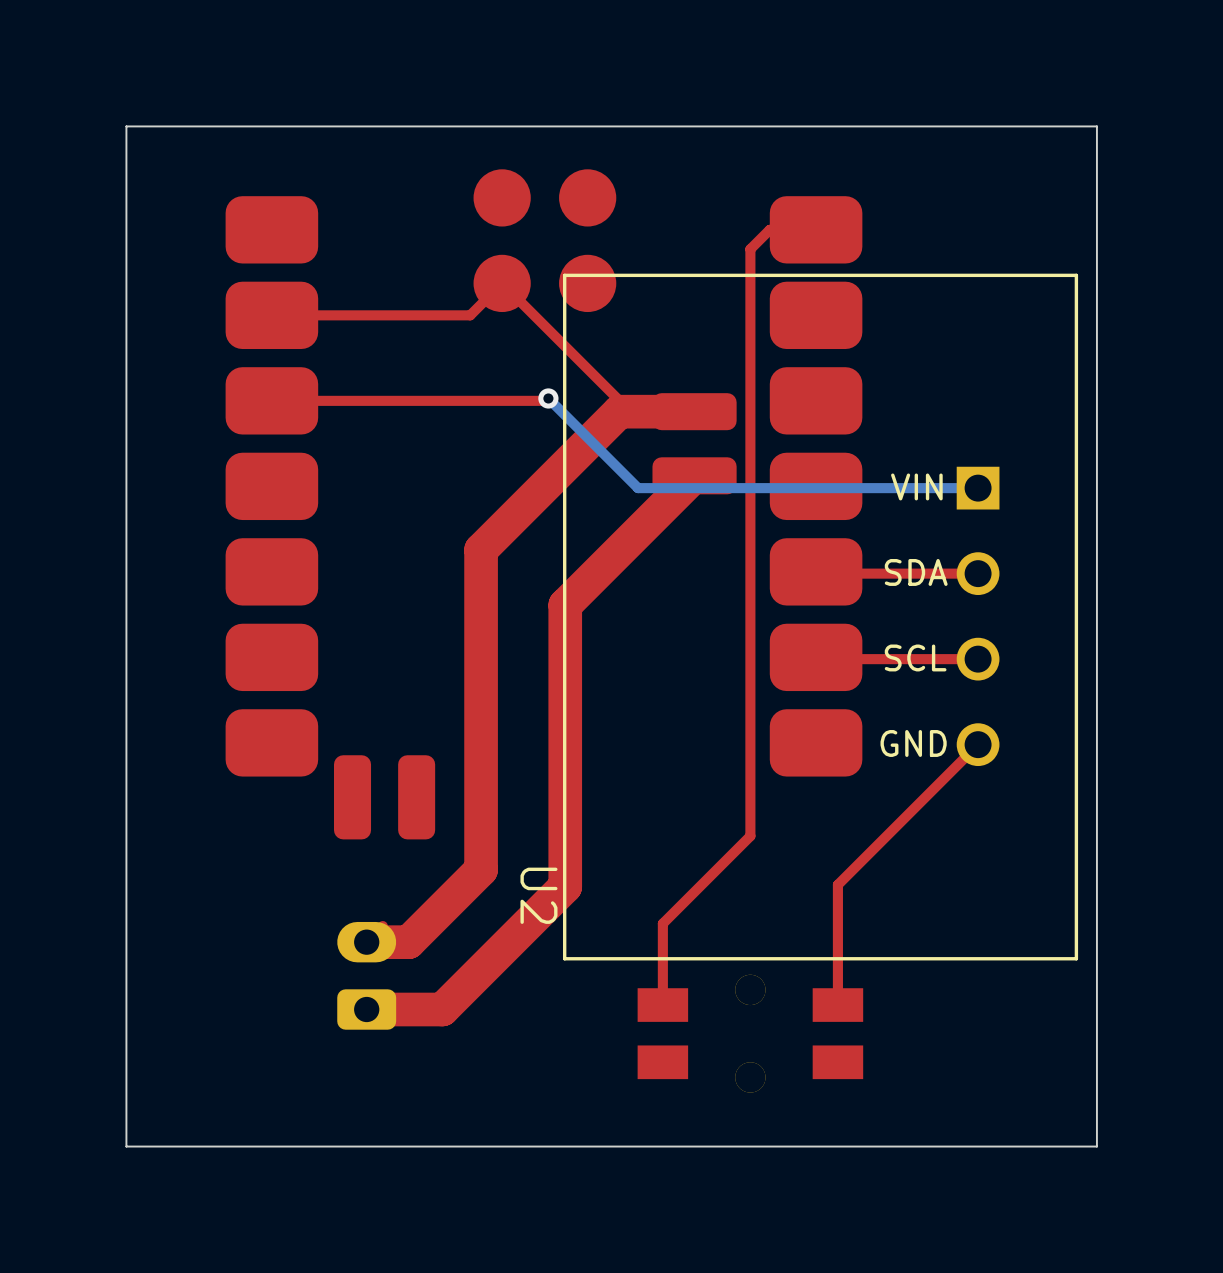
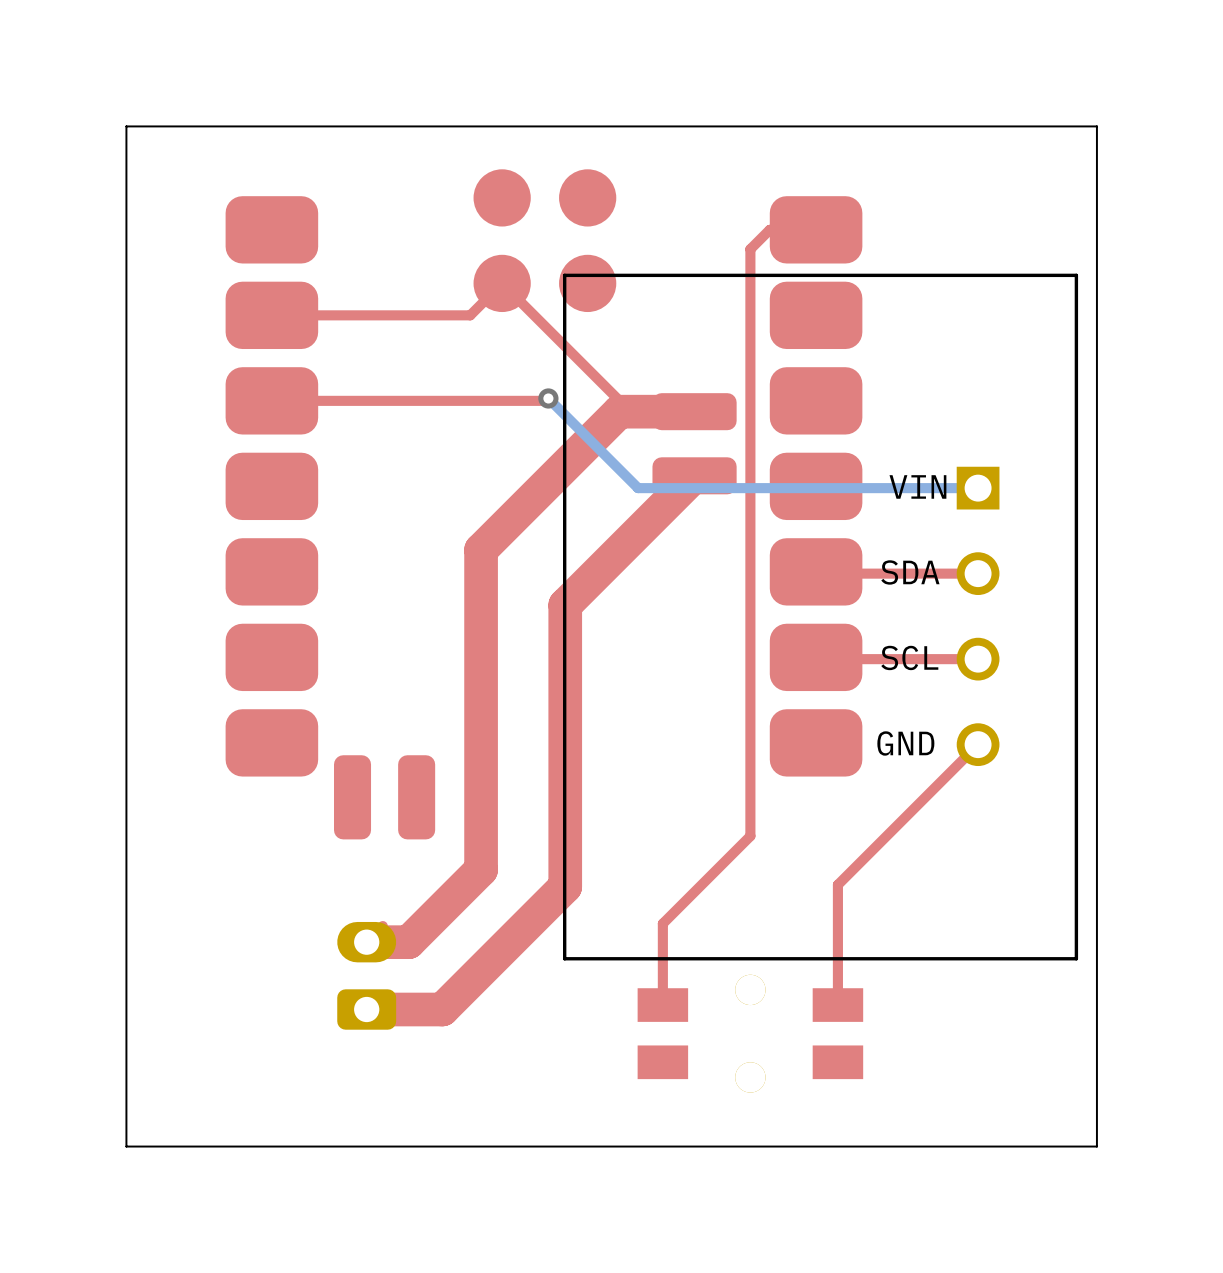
U2 name: U2 (538, 895) -> none

